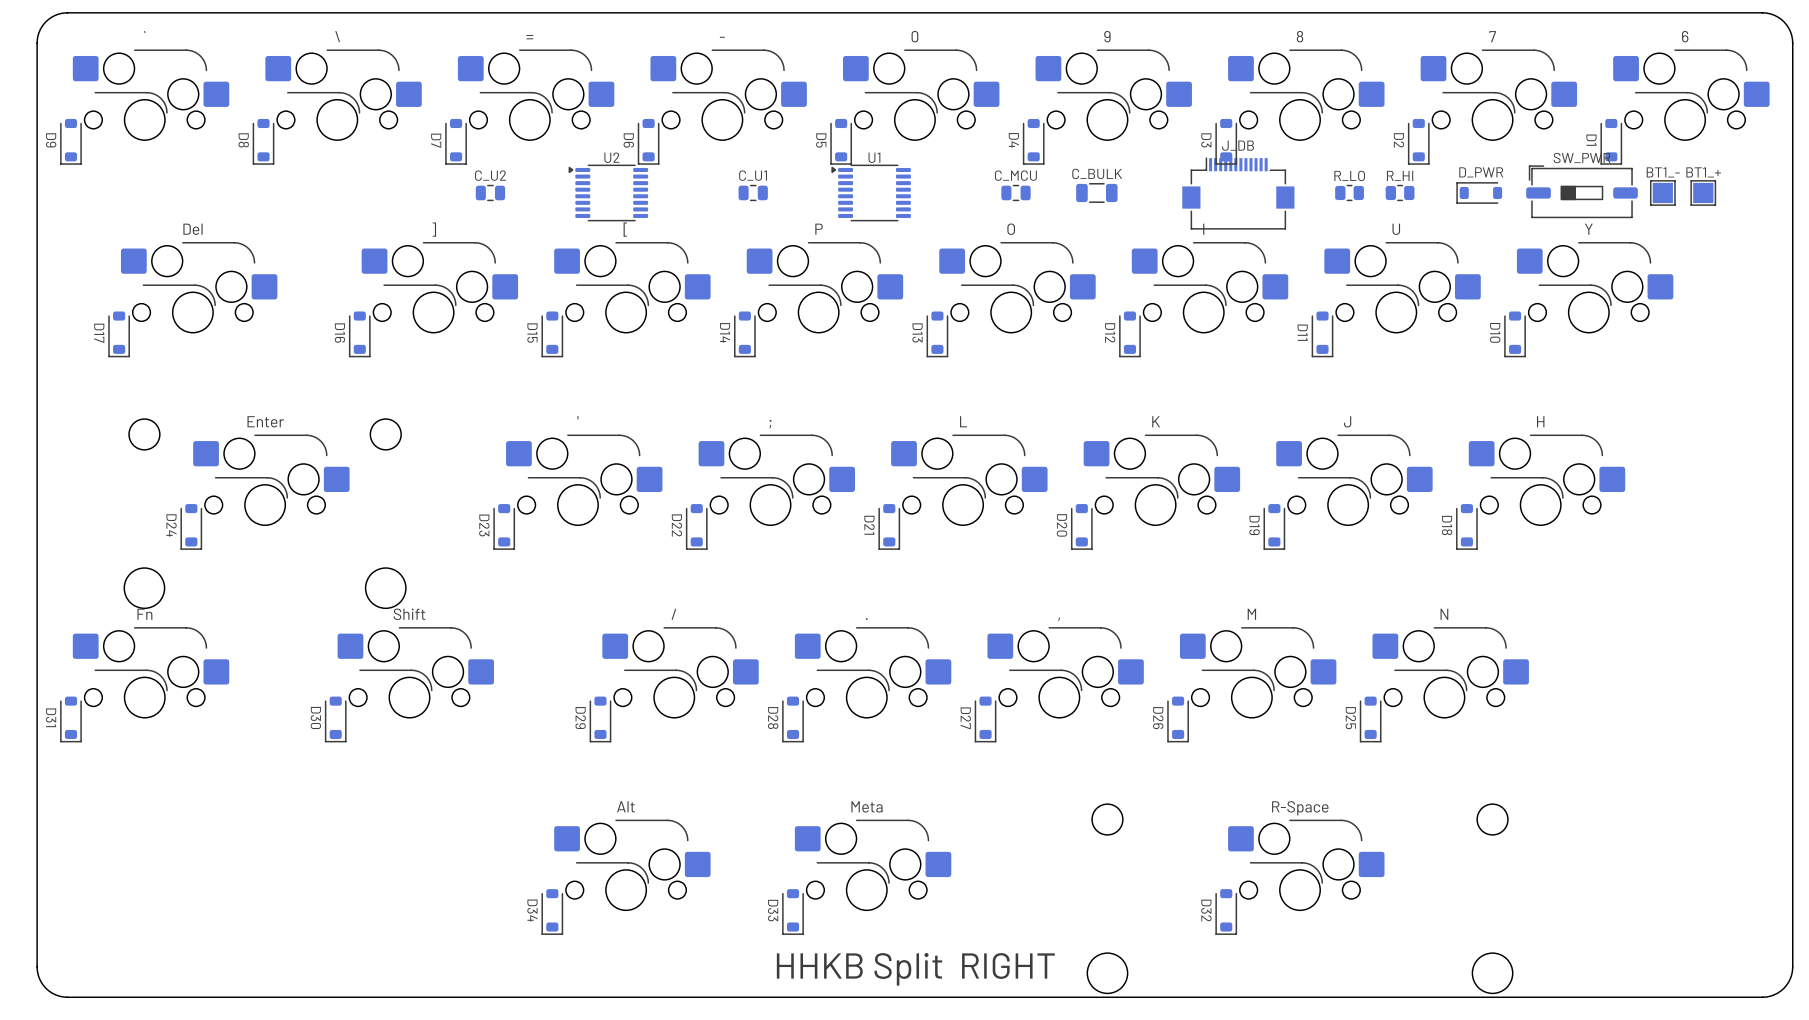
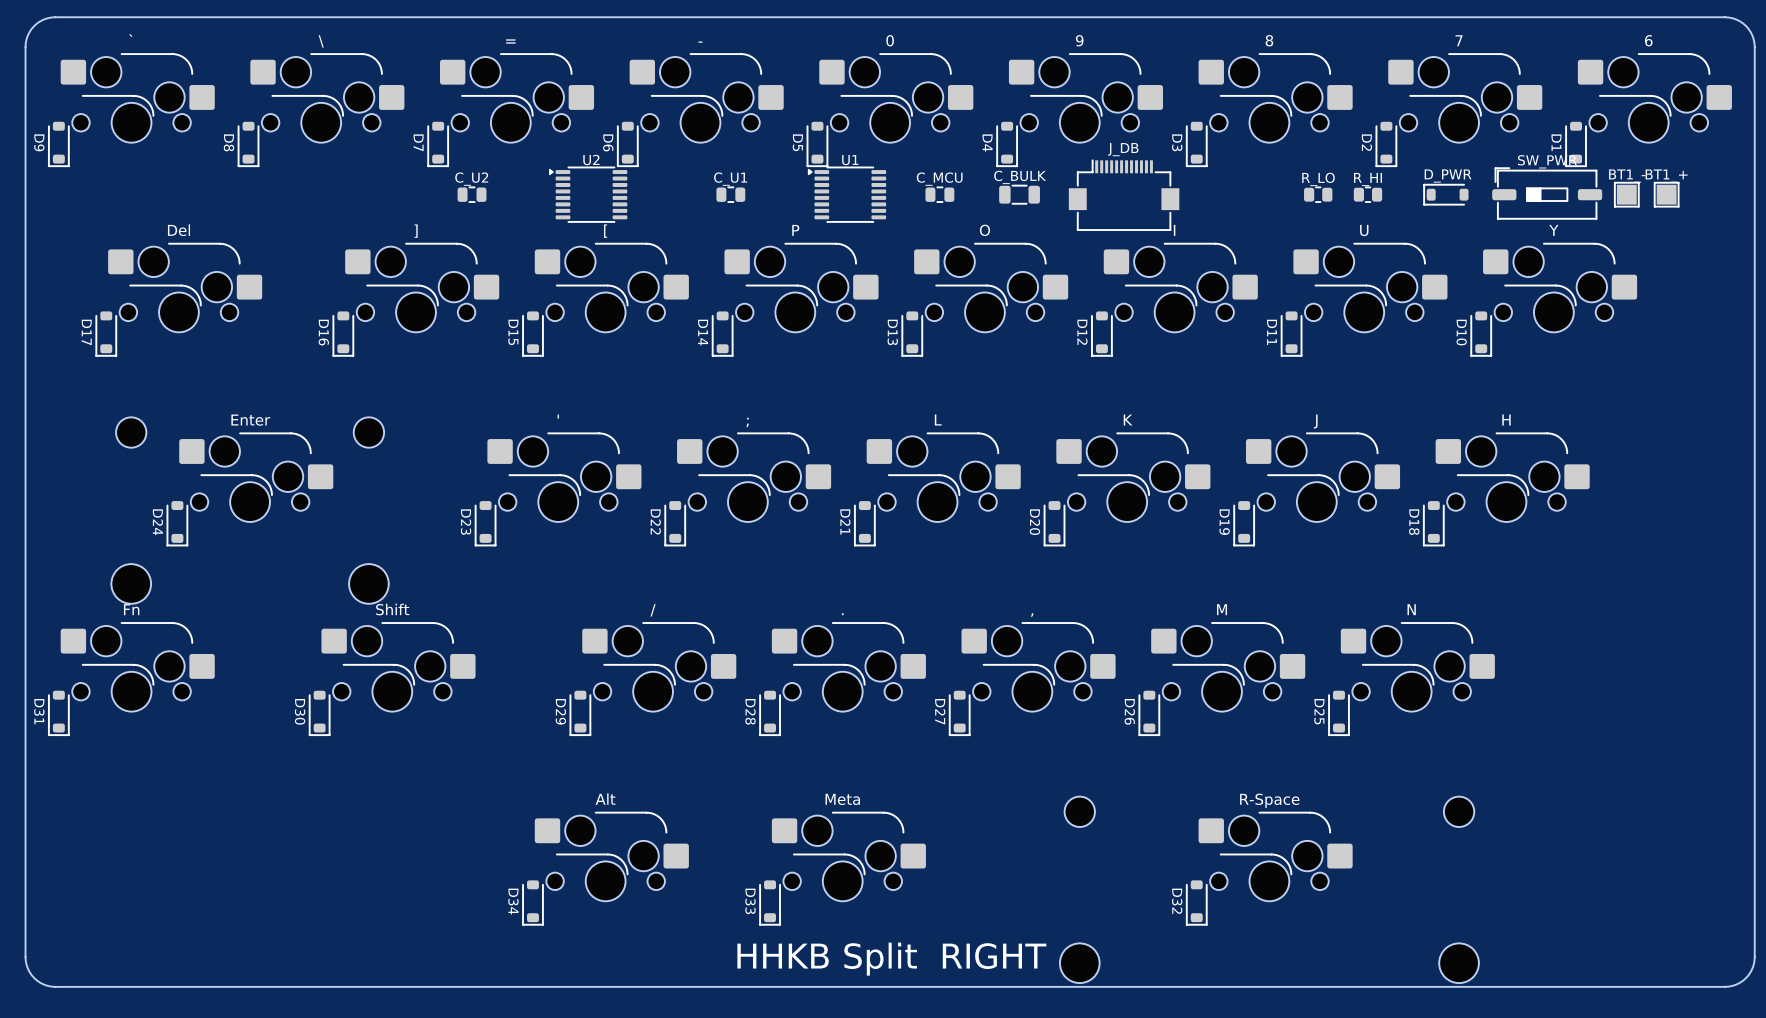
C_MCU position: (1016, 192) -> (939, 194)
C_BULK position: (1096, 192) -> (1019, 194)
J_DB position: (1238, 193) -> (1124, 195)

